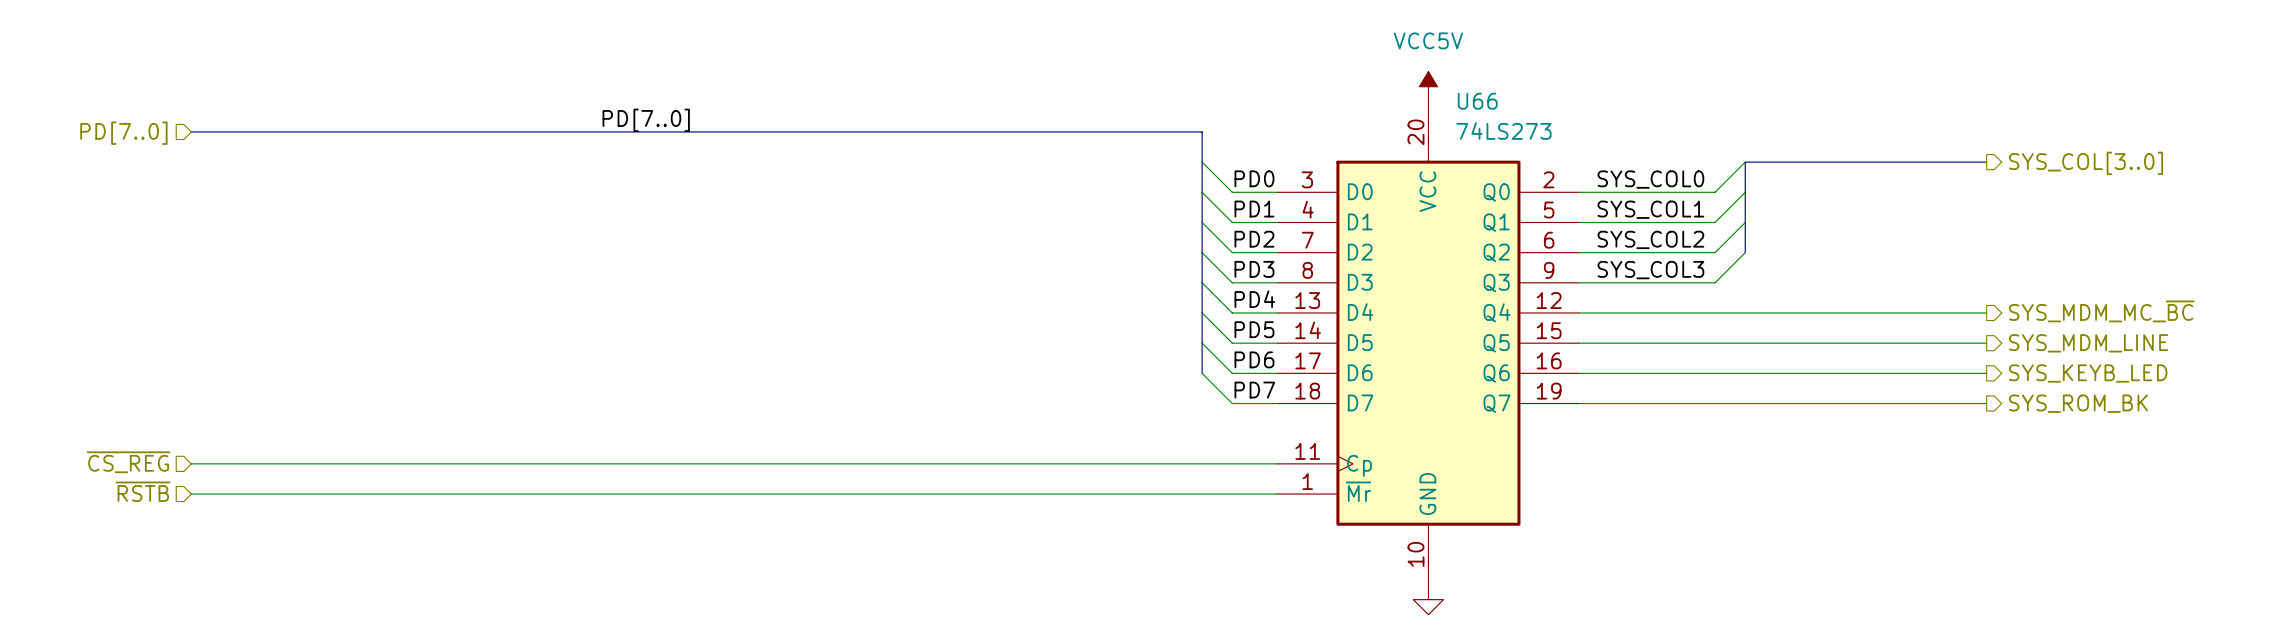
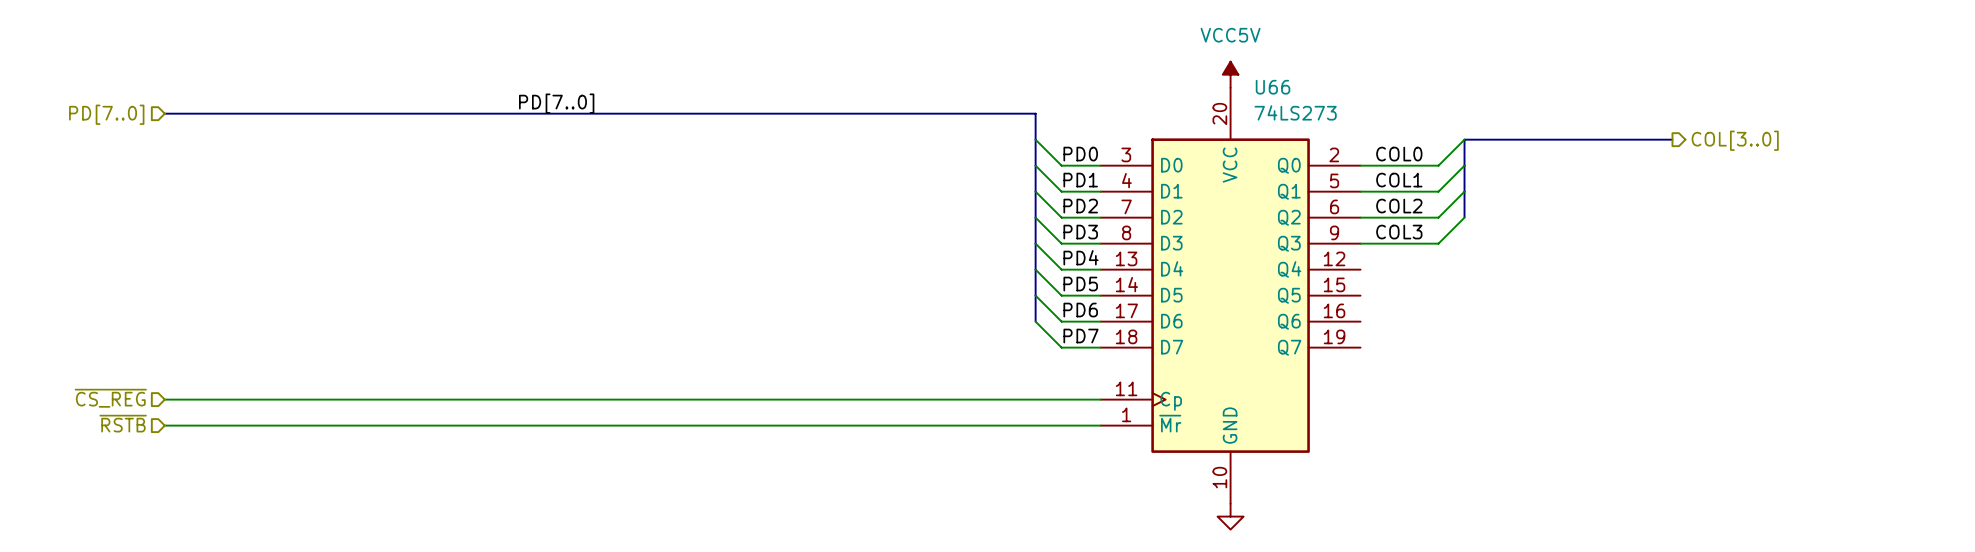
wire: (1745, 162) (1715, 192) (1669, 192) -> (1464, 139) (1438, 165)
bus: (1745, 162) (1745, 252) -> (1503, 139) (1464, 139) (1464, 217)
bus: (1941, 162) (1986, 162) -> none
hierarchical label: SYS_COL[3..0] (2086, 163) -> COL[3..0] (1735, 140)
label: SYS_COL0 (1650, 179) -> COL0 (1399, 154)
wire: (1745, 192) (1715, 222) (1669, 222) -> (1464, 165) (1438, 191)
label: SYS_COL1 (1650, 209) -> COL1 (1399, 180)
wire: (1745, 222) (1715, 252) (1669, 252) -> (1464, 191) (1438, 217)
label: SYS_COL2 (1650, 239) -> COL2 (1399, 206)
wire: (1745, 252) (1715, 282) (1669, 282) -> (1464, 217) (1438, 243)
label: SYS_COL3 (1650, 270) -> COL3 (1399, 232)
hierarchical label: SYS_MDM_MC_~{BC} (2101, 311) -> none
wire: (1579, 313) (1986, 313) -> none
wire: (1579, 343) (1986, 343) -> none
hierarchical label: SYS_MDM_LINE (2088, 343) -> none
wire: (1579, 373) (1986, 373) -> none
hierarchical label: SYS_KEYB_LED (2088, 373) -> none
wire: (1579, 403) (1986, 403) -> none
hierarchical label: SYS_ROM_BK (2078, 403) -> none

